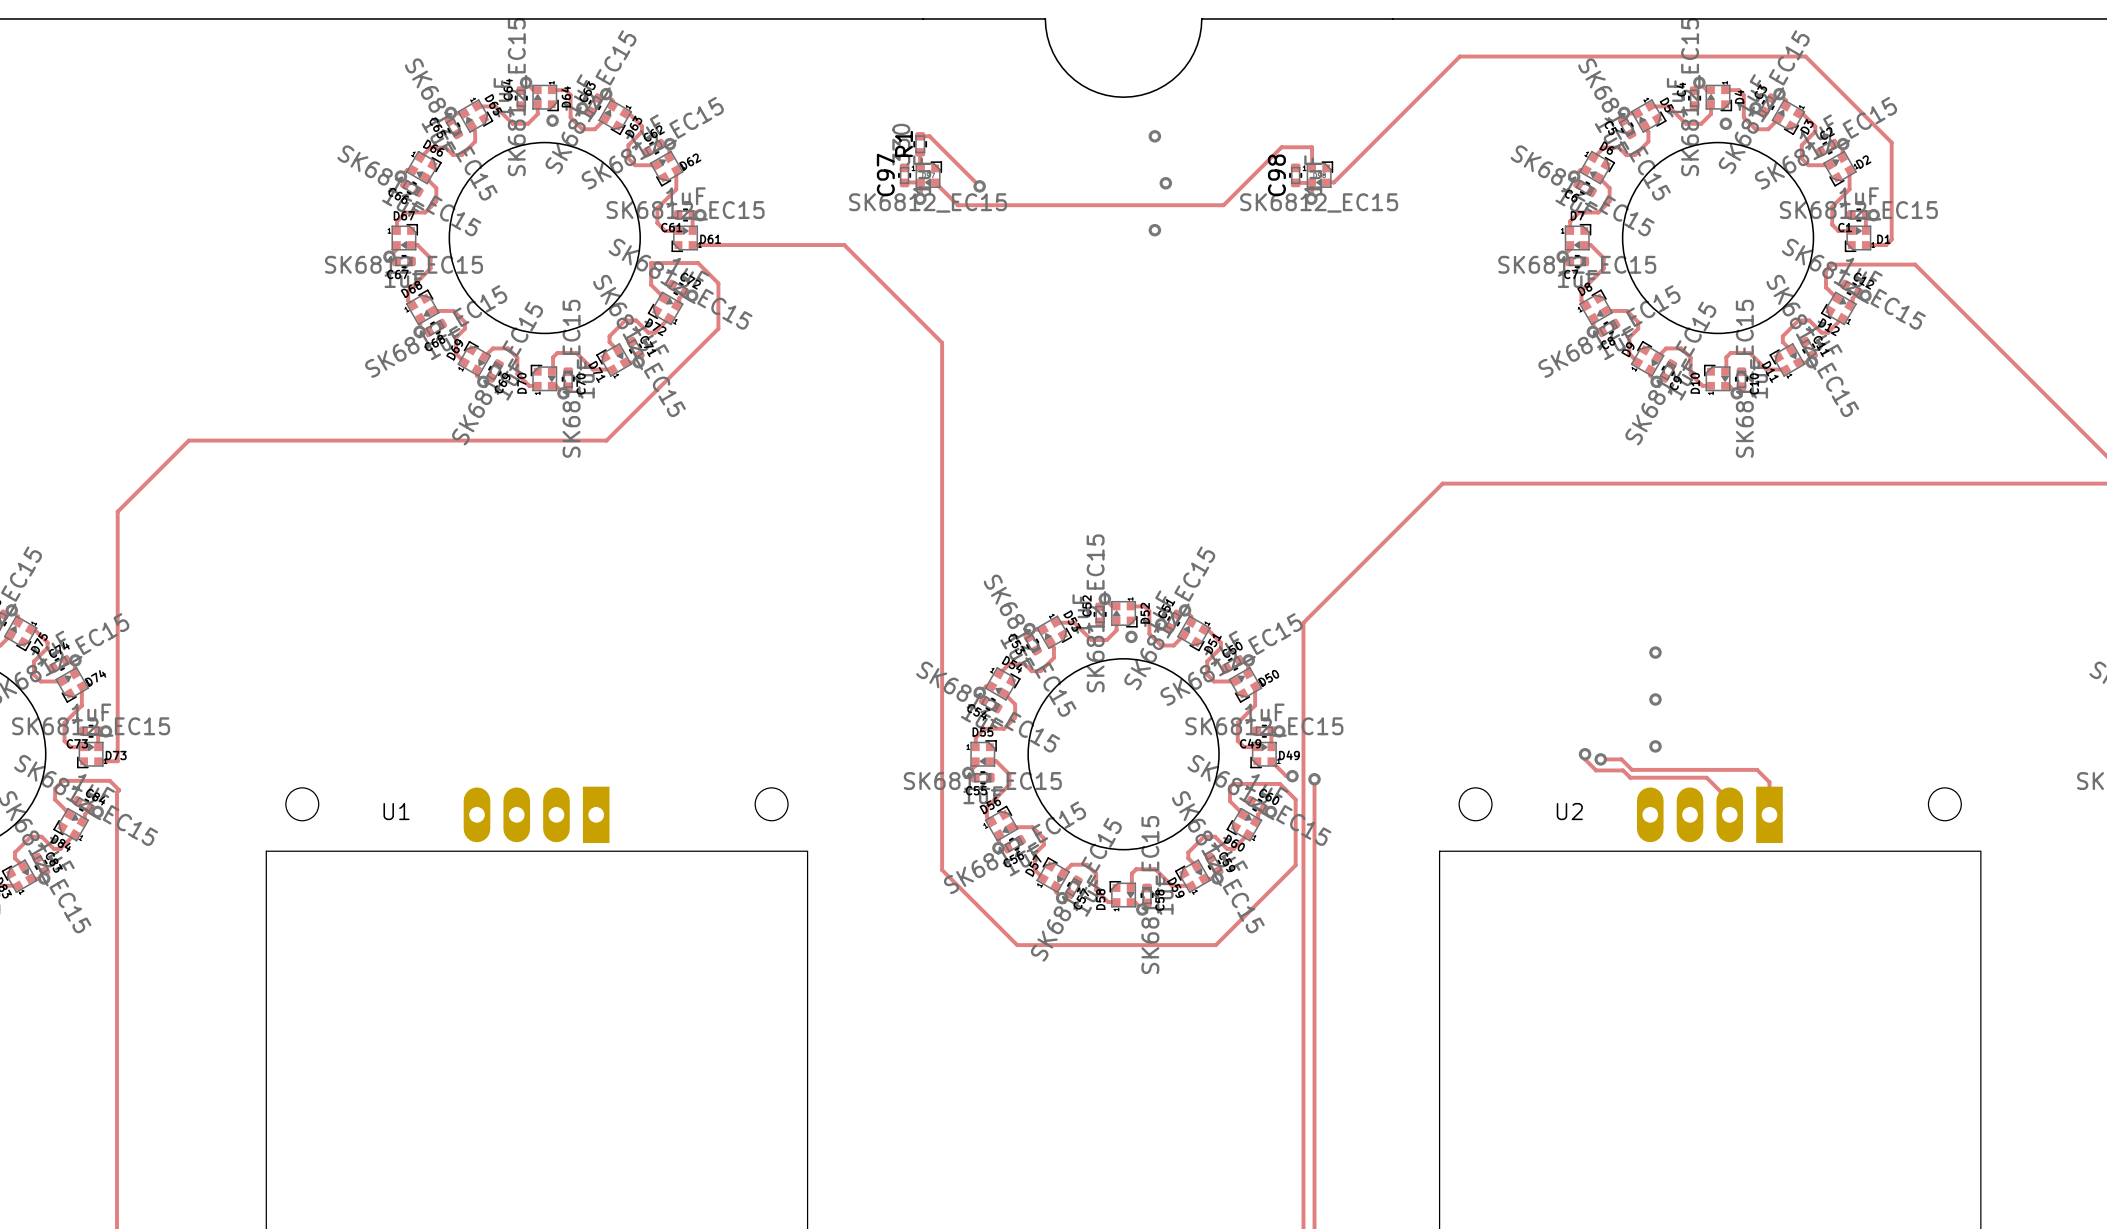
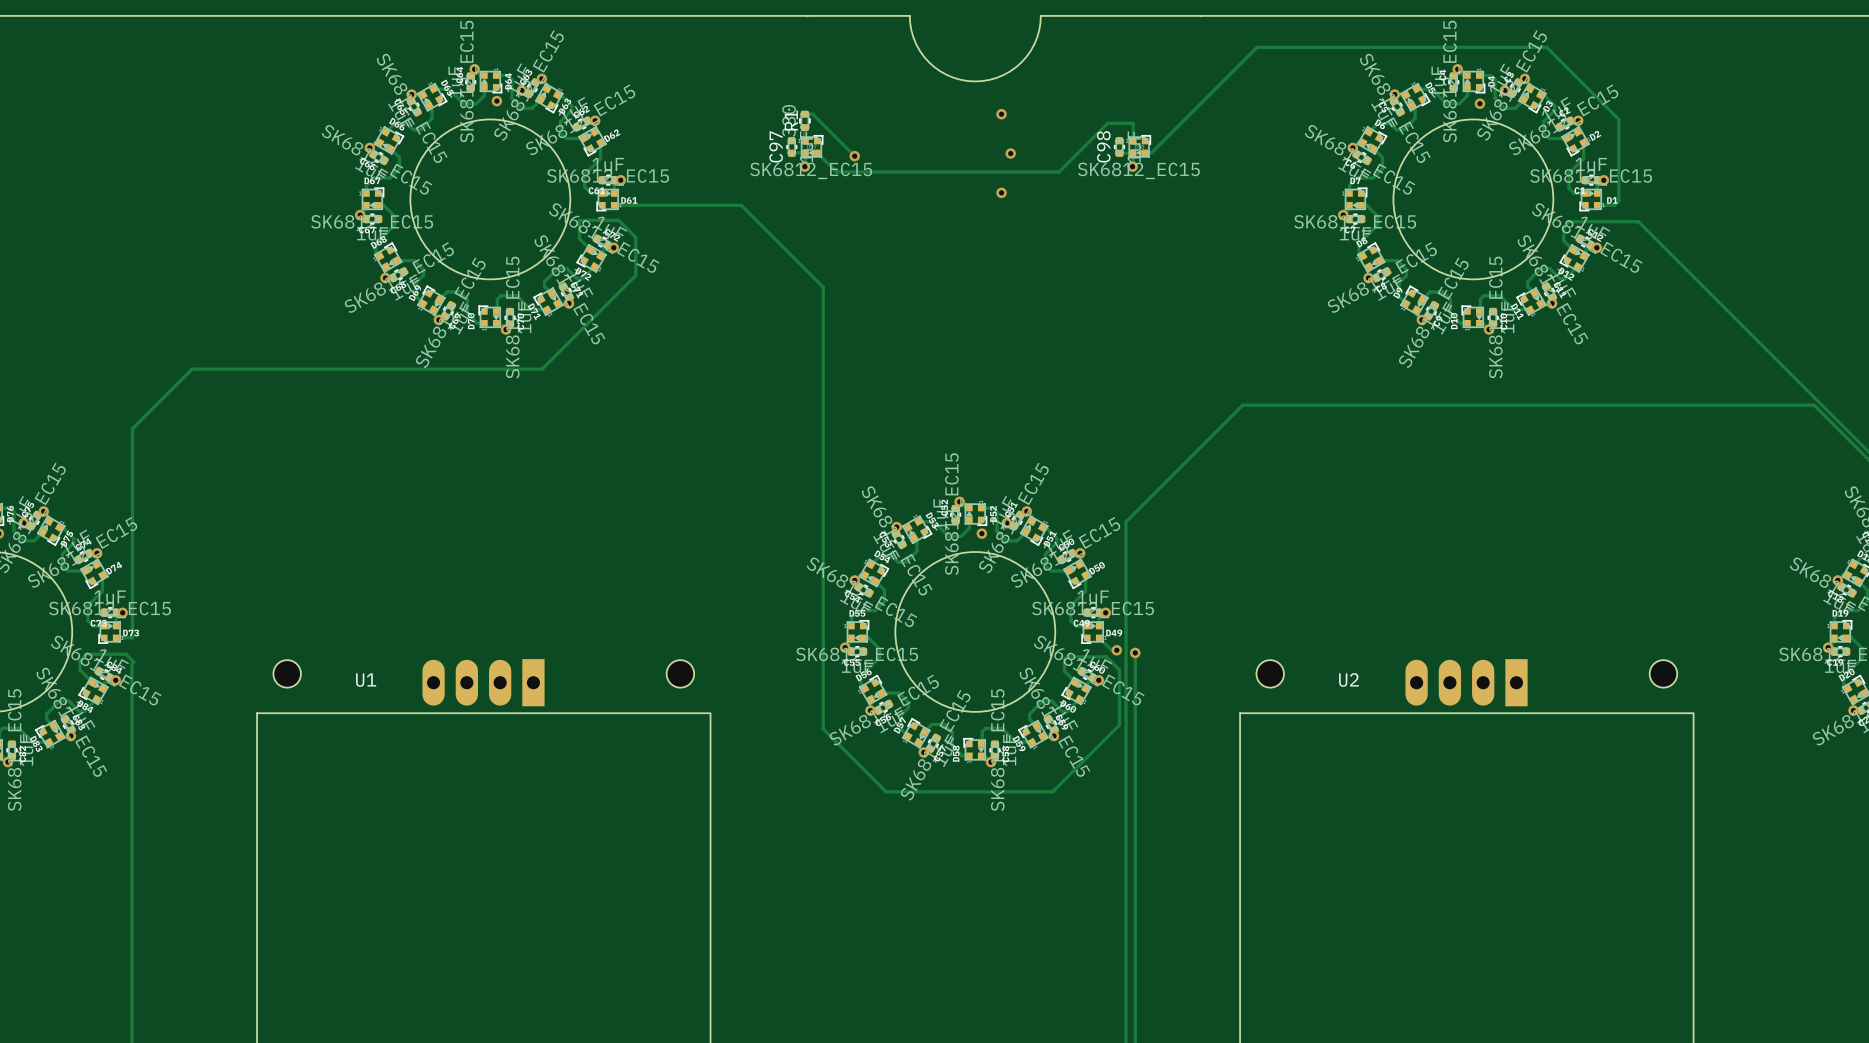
via: (1655, 652) -> none
via: (1655, 699) -> none
via: (1655, 746) -> none
track: (1585, 754) (1585, 759) (1596, 770) (1623, 770) (1630, 777) (1706, 777) (1729, 800) (1729, 814) -> none
via: (1585, 754) -> none
track: (1600, 759) (1621, 759) (1632, 769) (1757, 769) (1769, 782) (1769, 814) -> none
via: (1600, 759) -> none

